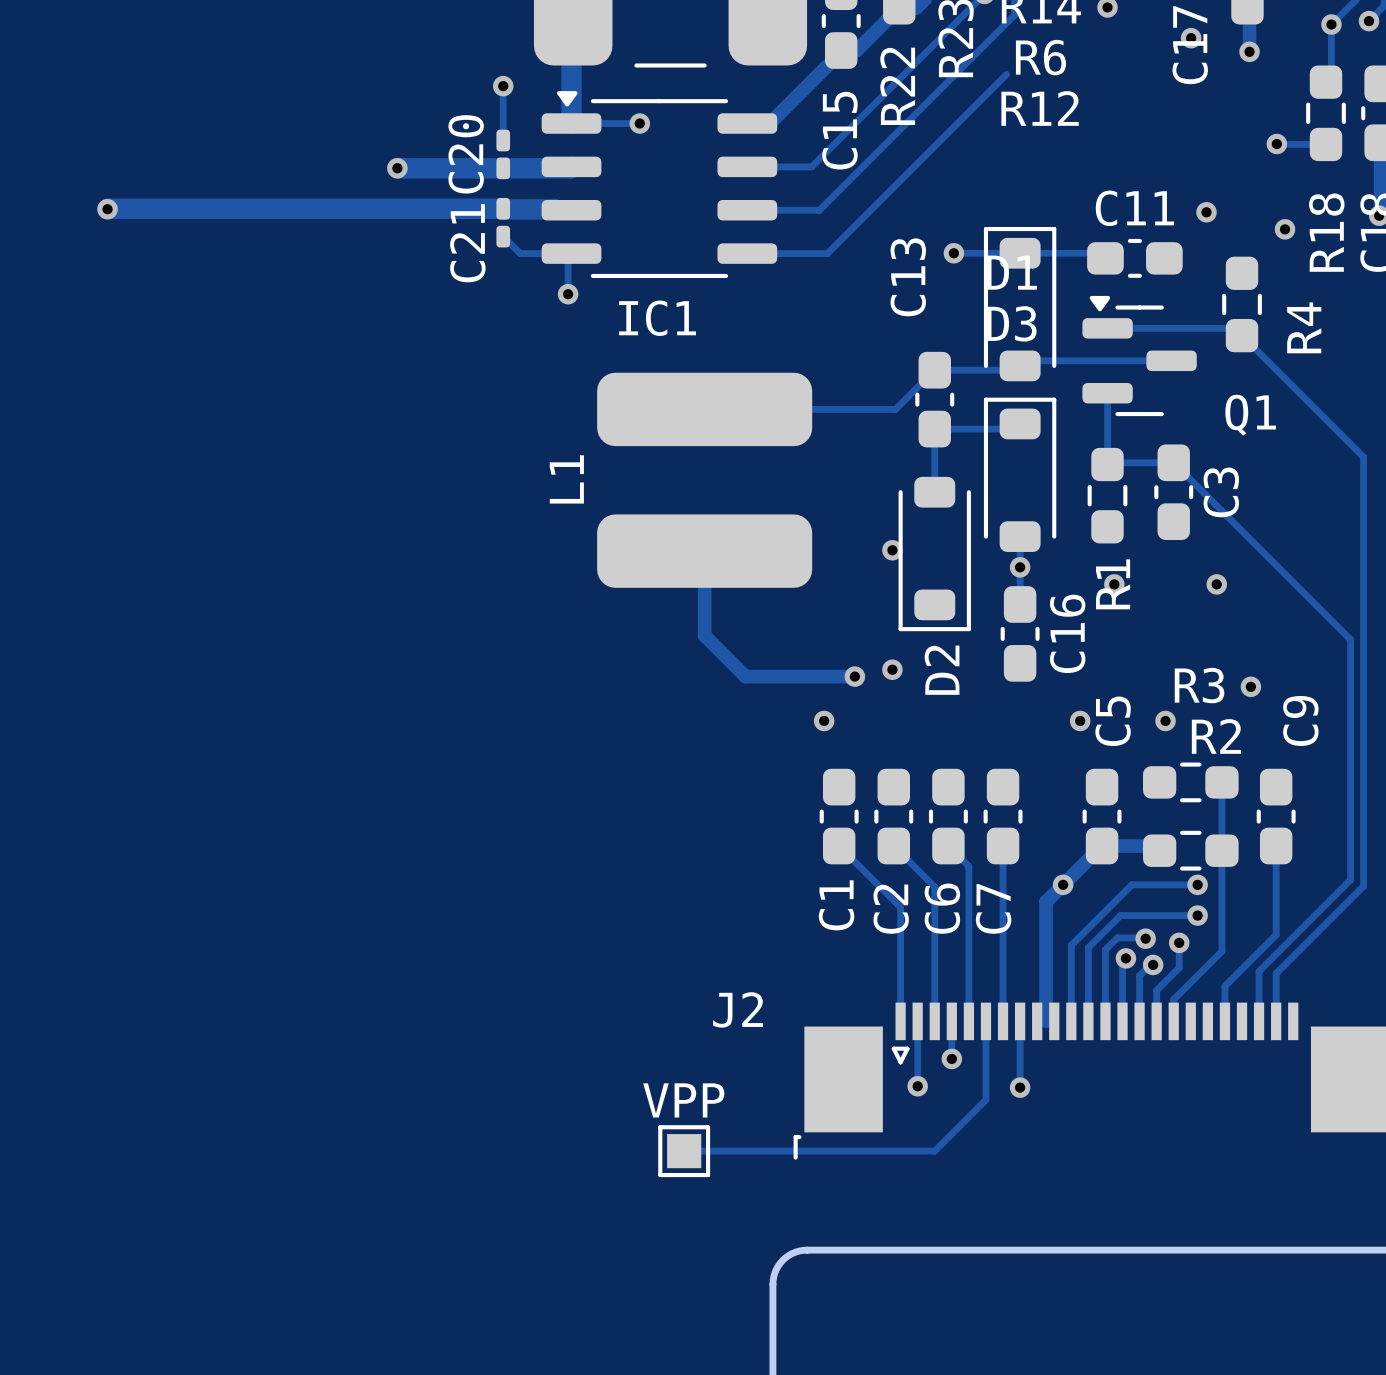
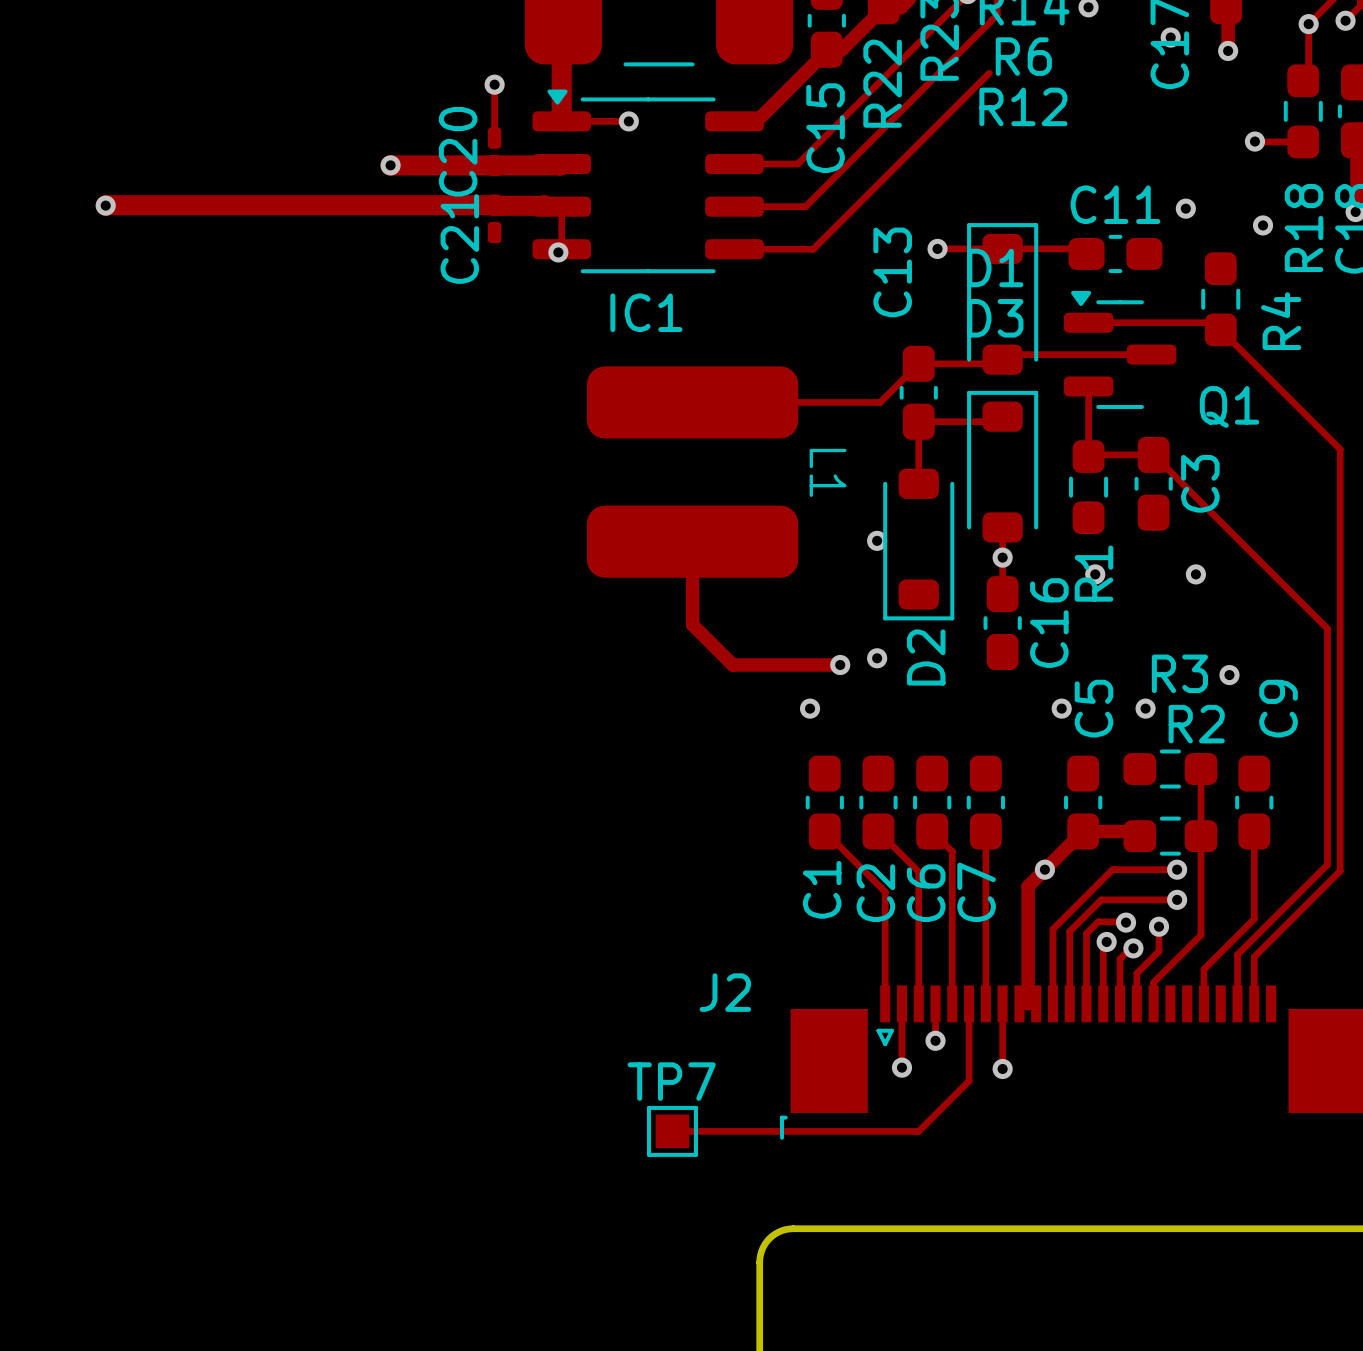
track: (503, 236) (520, 253) (571, 253) -> (561, 215) (561, 249)
track: (568, 256) (568, 294) -> none
via position: (568, 294) -> (558, 252)
L1 name rotation: 0° (566, 479) -> 180° (828, 472)
L1 name position: L1 (566, 479) -> L1 (828, 472)
VPP name: VPP (683, 1100) -> TP7 (671, 1081)

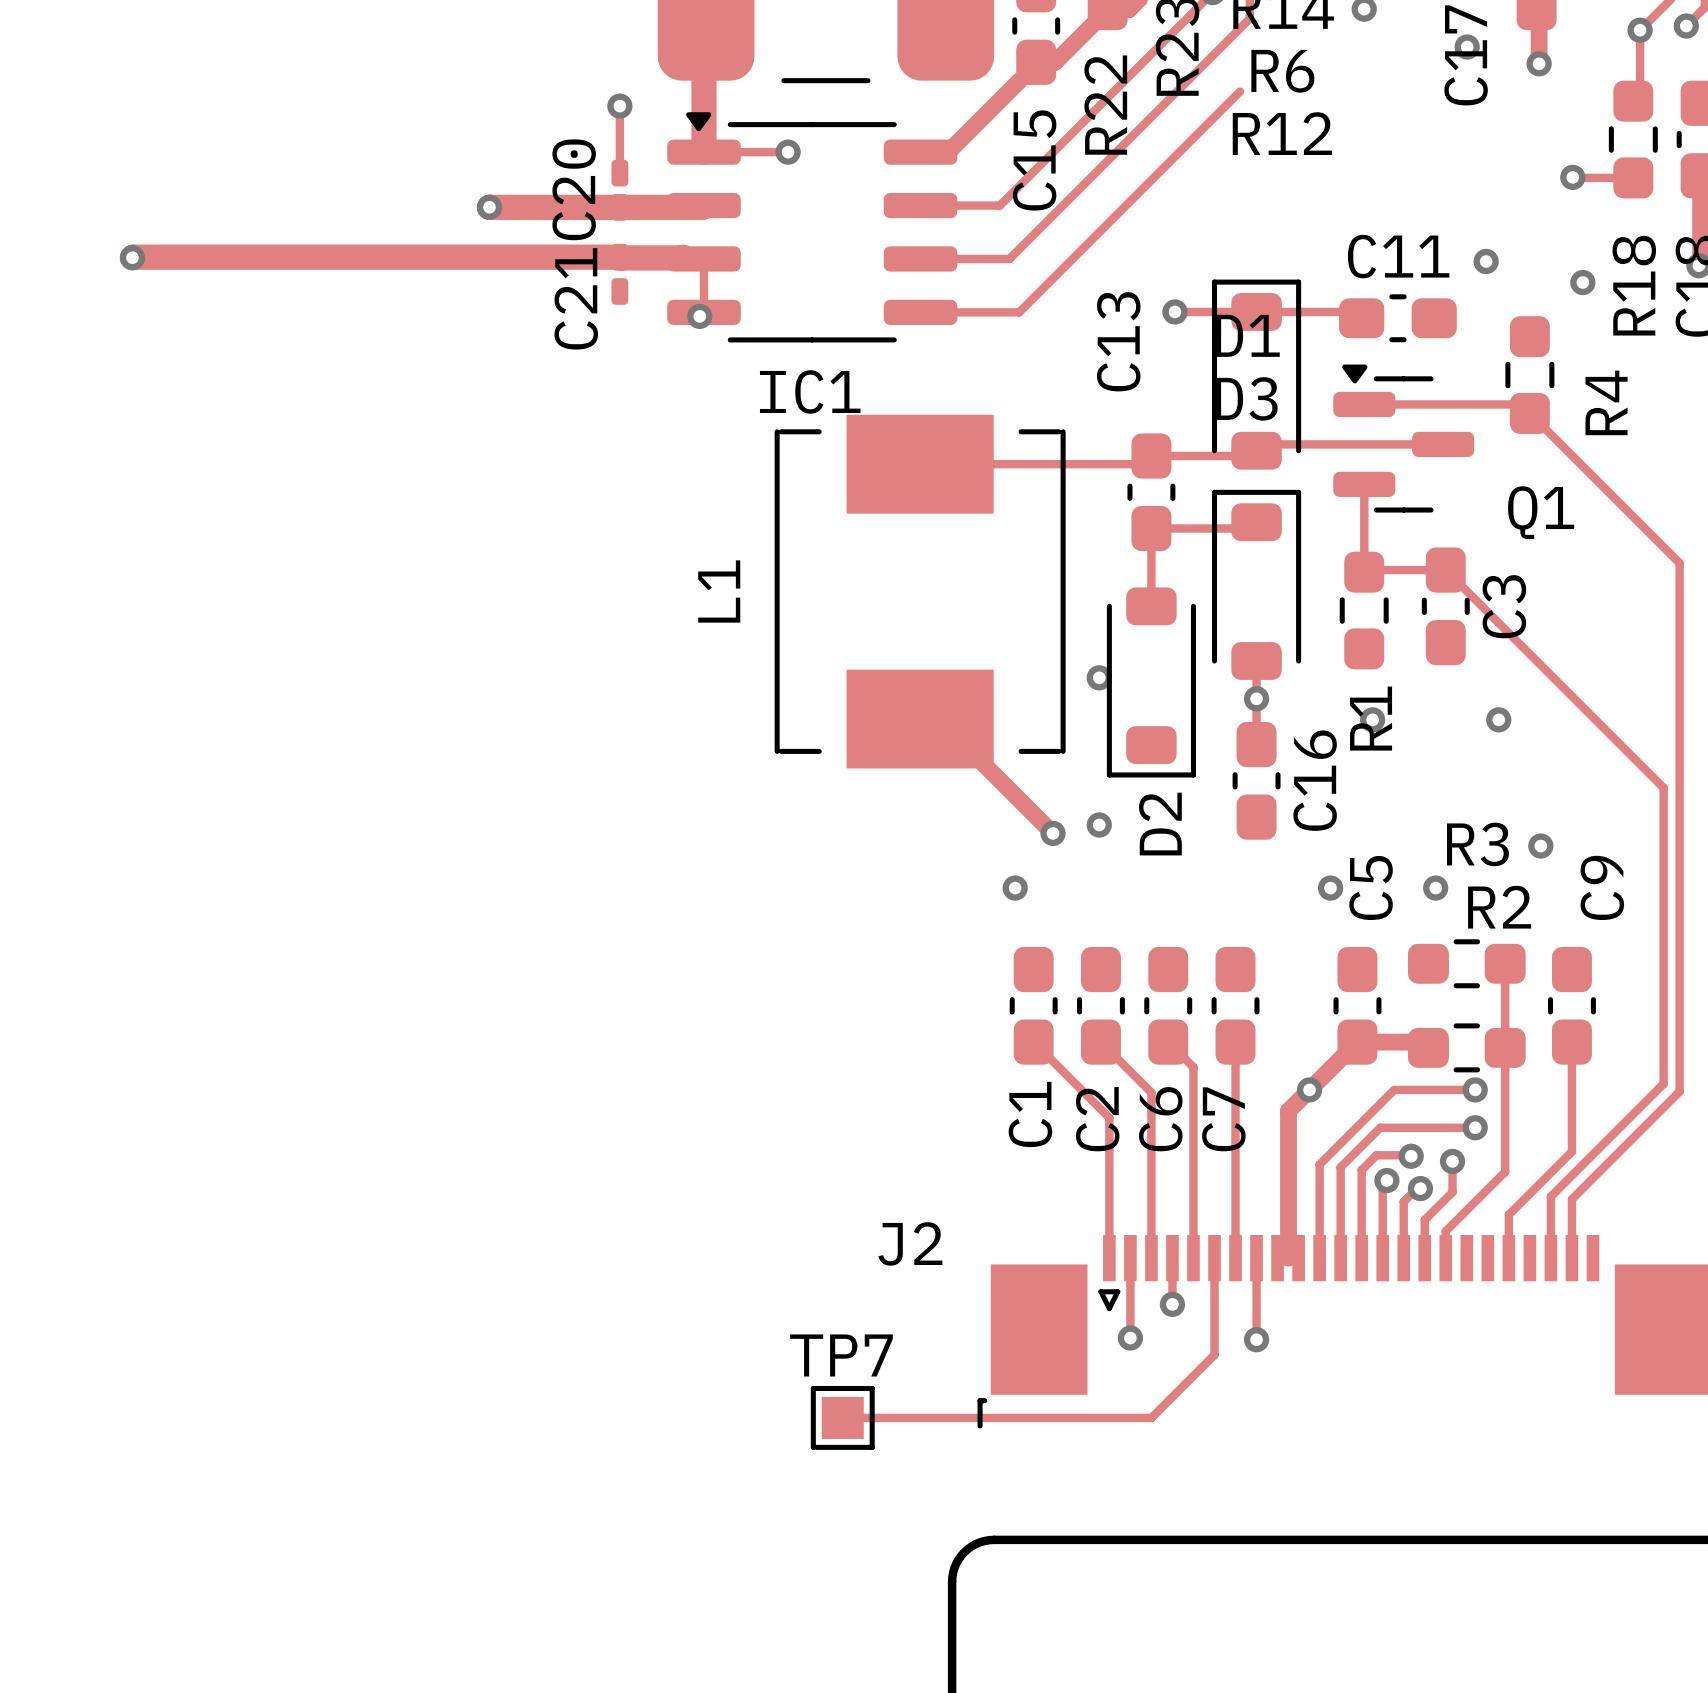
L1 footprint: [586, 366, 799, 578] -> [774, 414, 1066, 769]
track: (734, 370) (766, 402) (880, 402) (912, 370) -> (920, 464) (1143, 464)
L1 name position: L1 (828, 472) -> L1 (719, 591)
track: (692, 541) (692, 624) (732, 665) (840, 665) -> (920, 719) (938, 719) (1053, 833)

